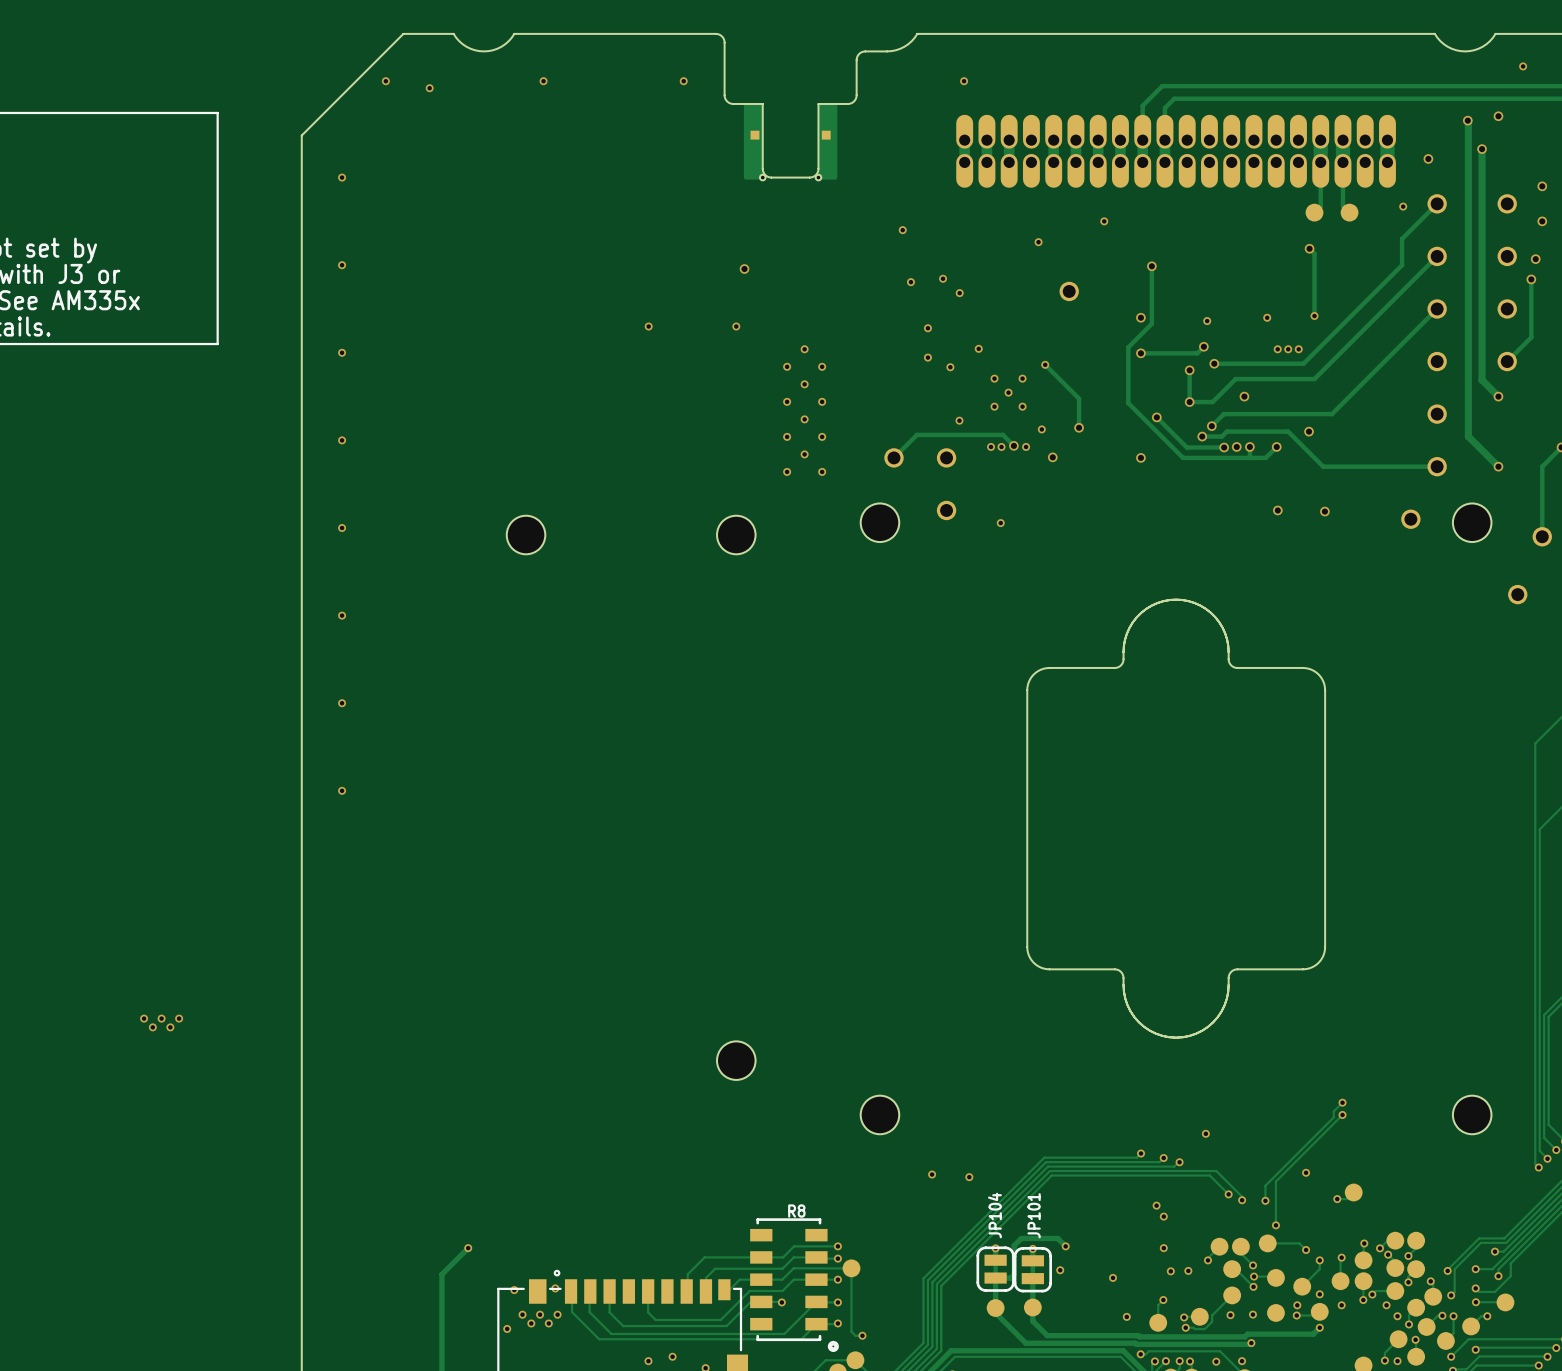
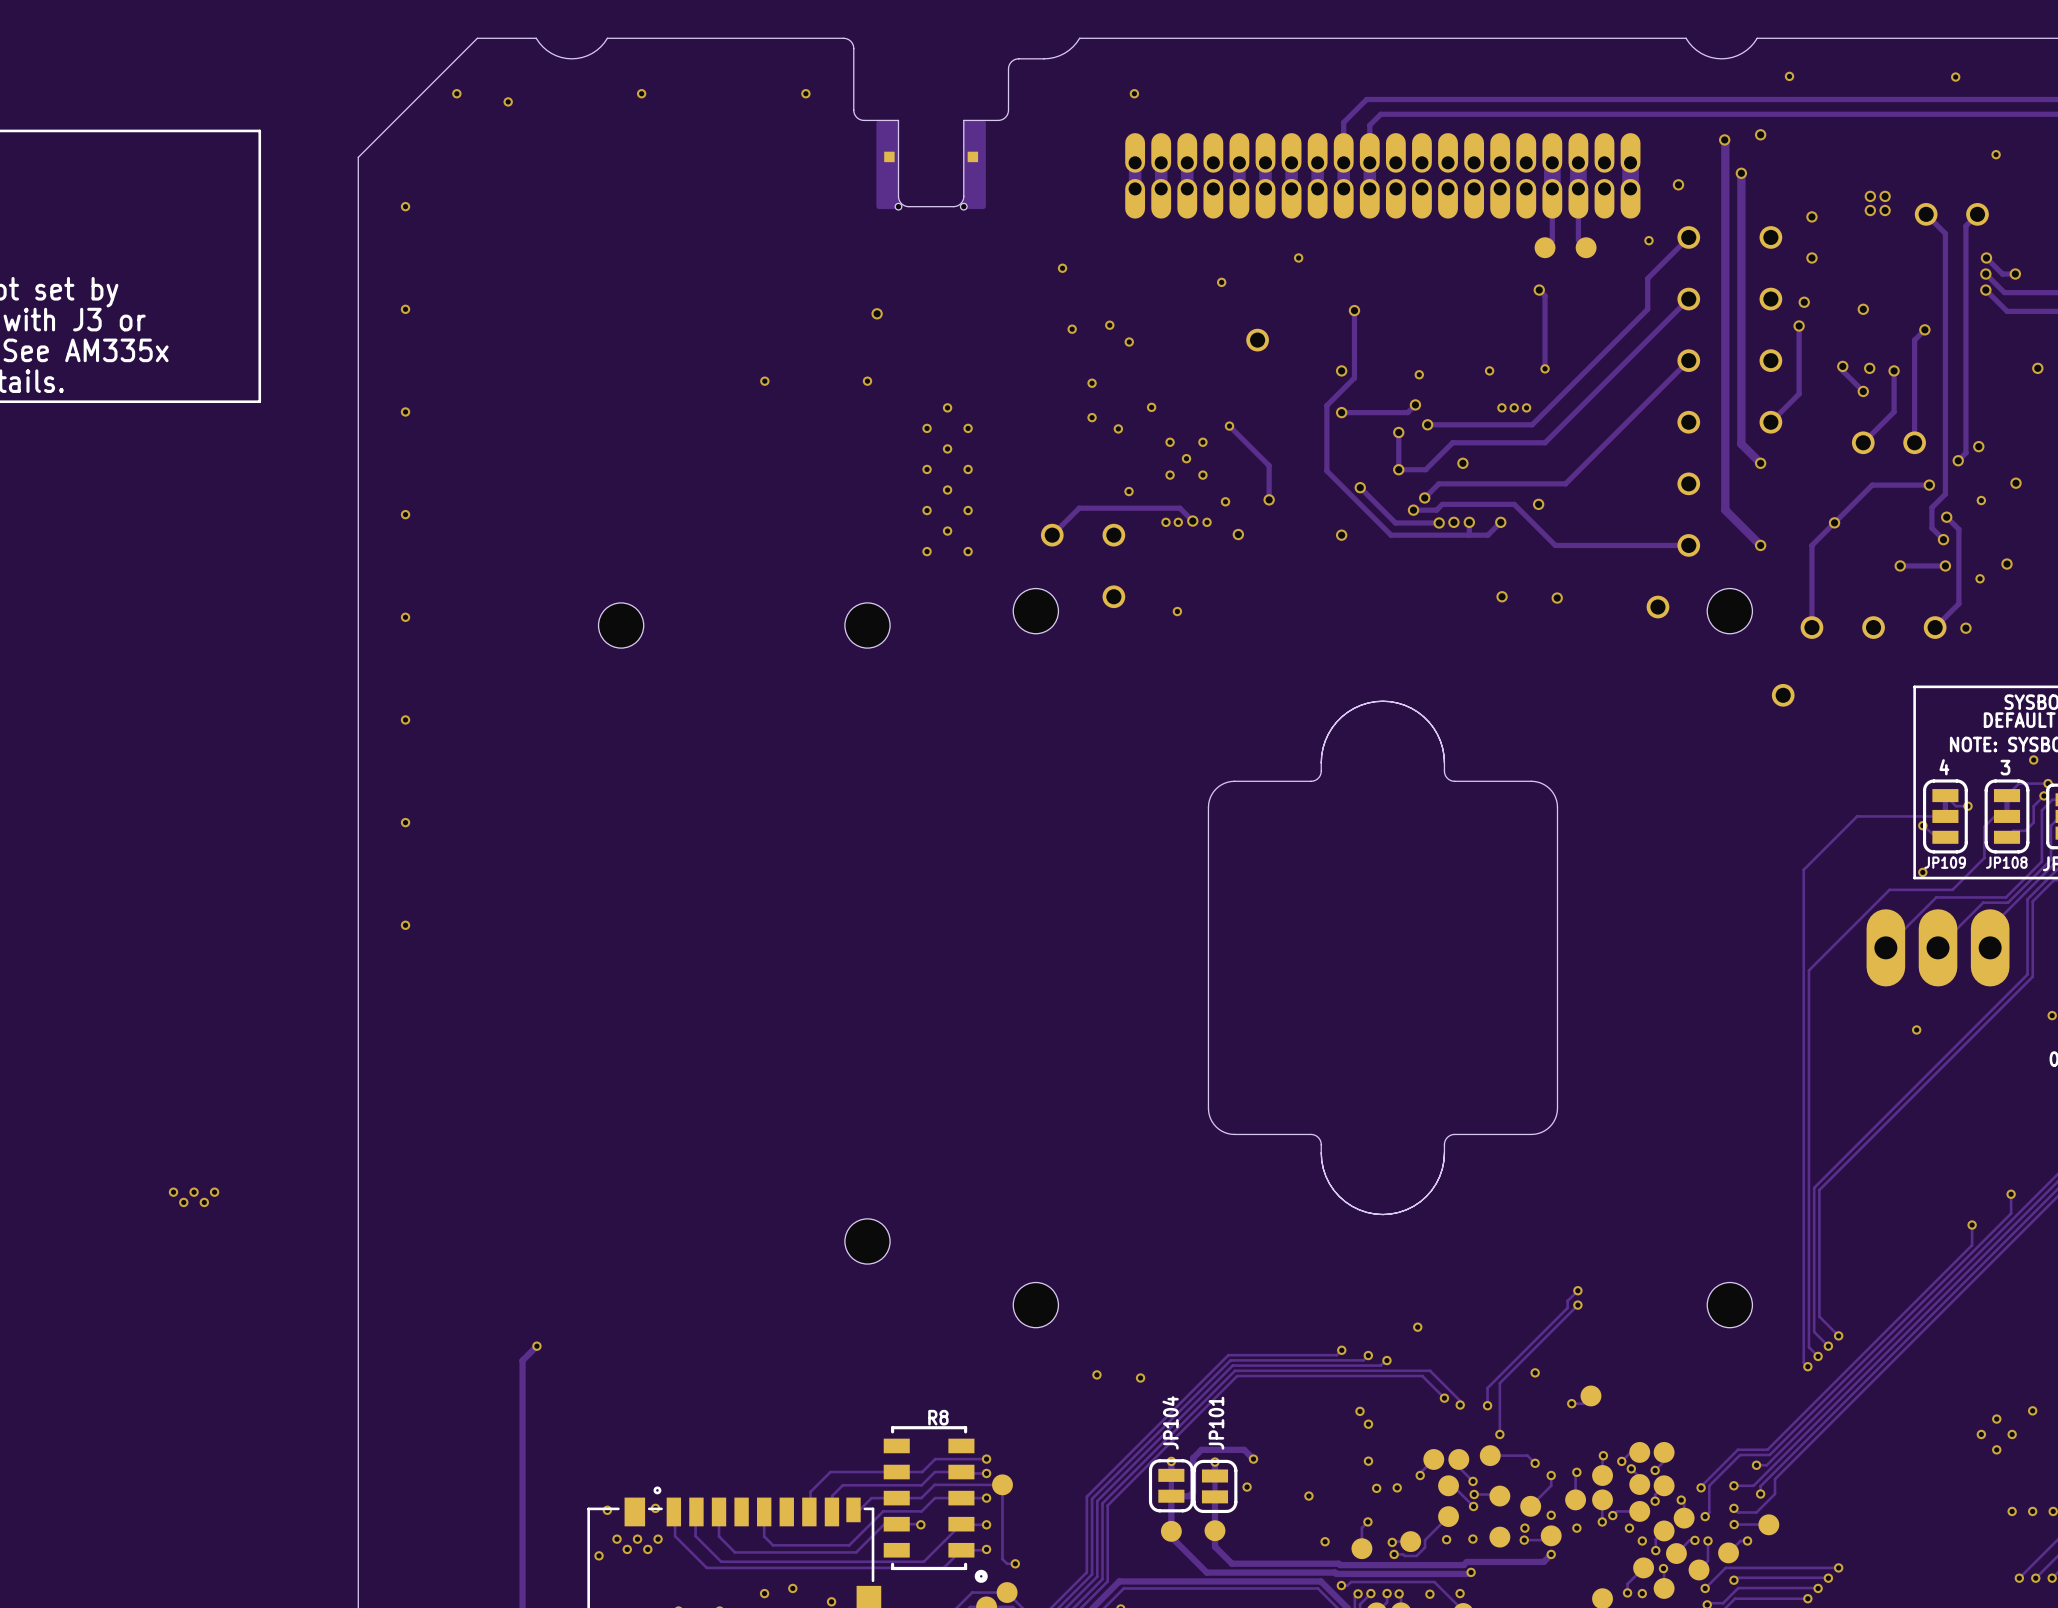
track: (468, 1248) (441, 1274) -> (536, 1346) (522, 1360) (522, 1491)
via position: (468, 1248) -> (536, 1346)

